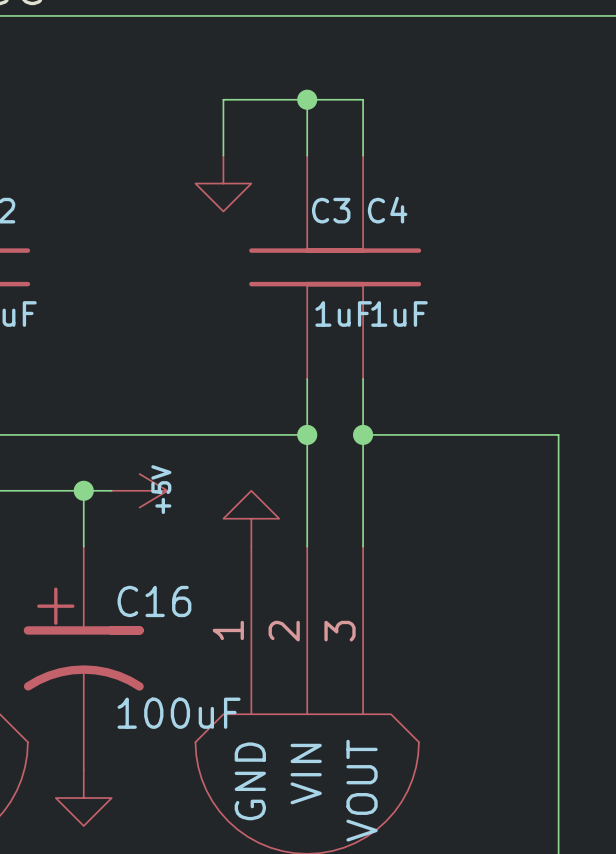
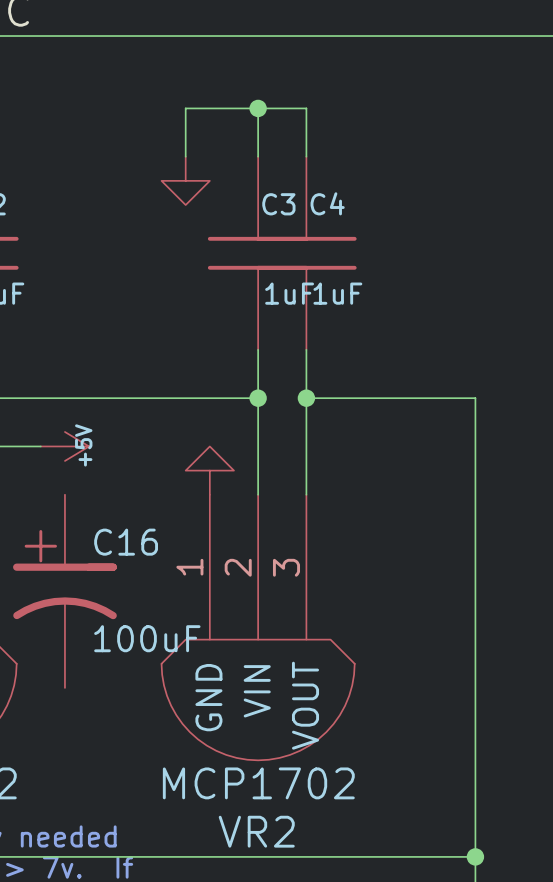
wire: (83, 490) (83, 546) -> none
junction: (83, 490) -> none
power symbol position: +5V (139, 490) -> +5V (64, 446)
power symbol: (83, 798) -> none

